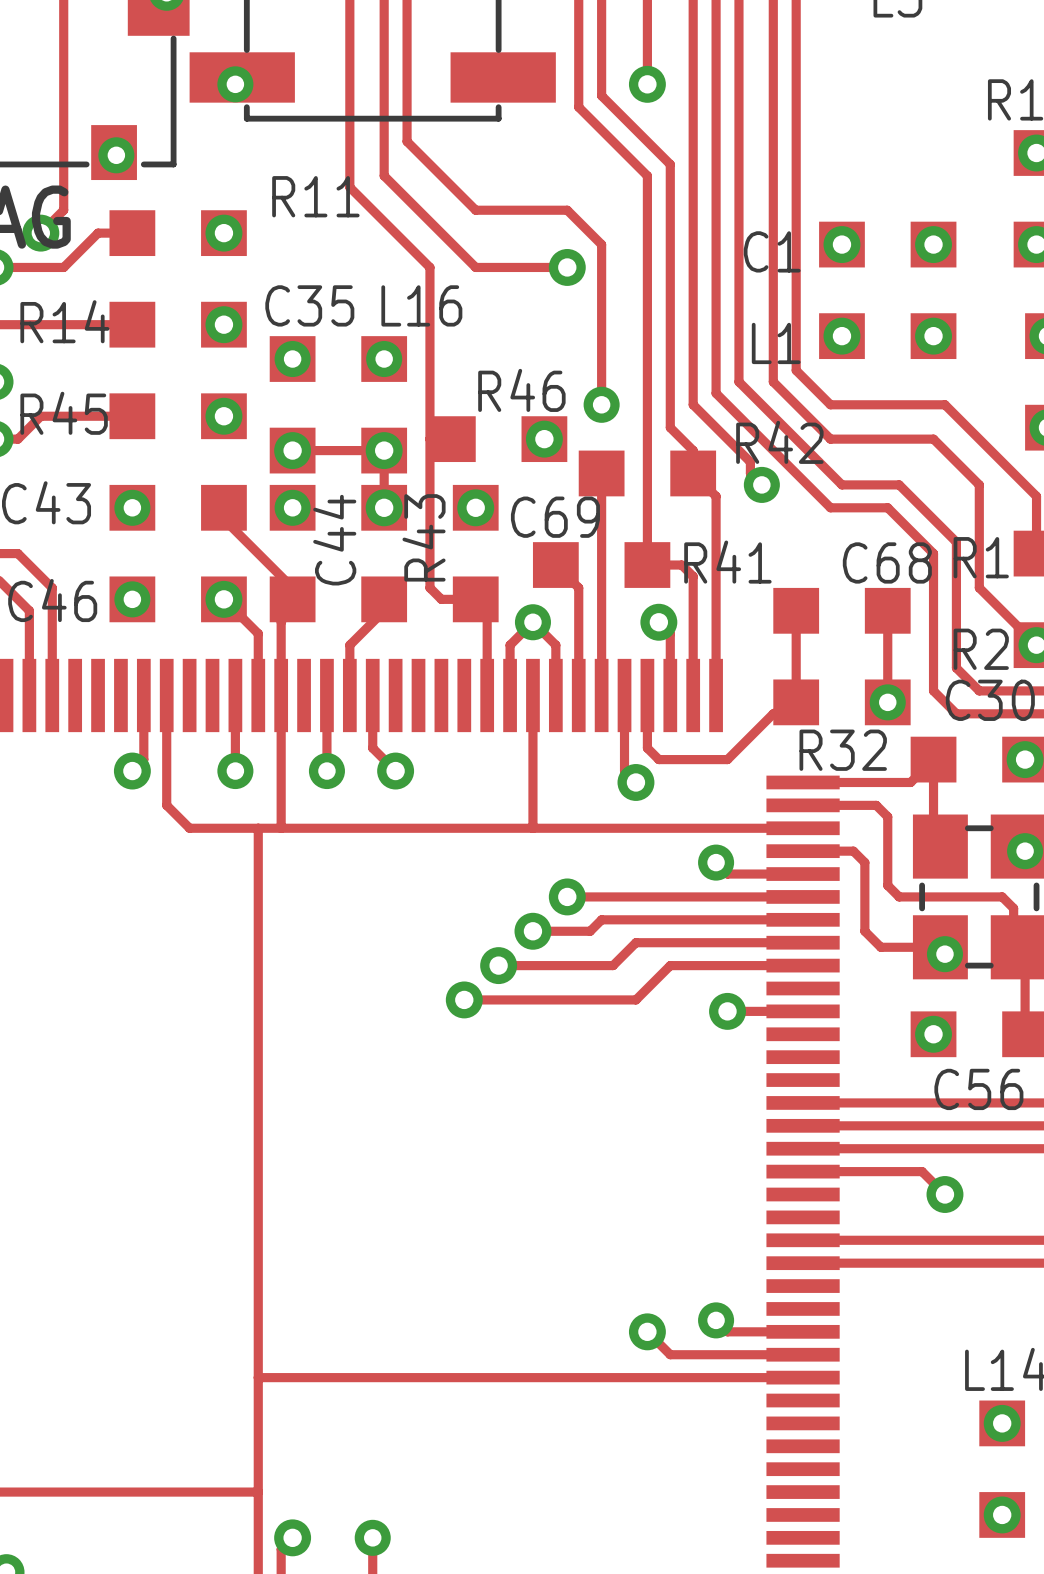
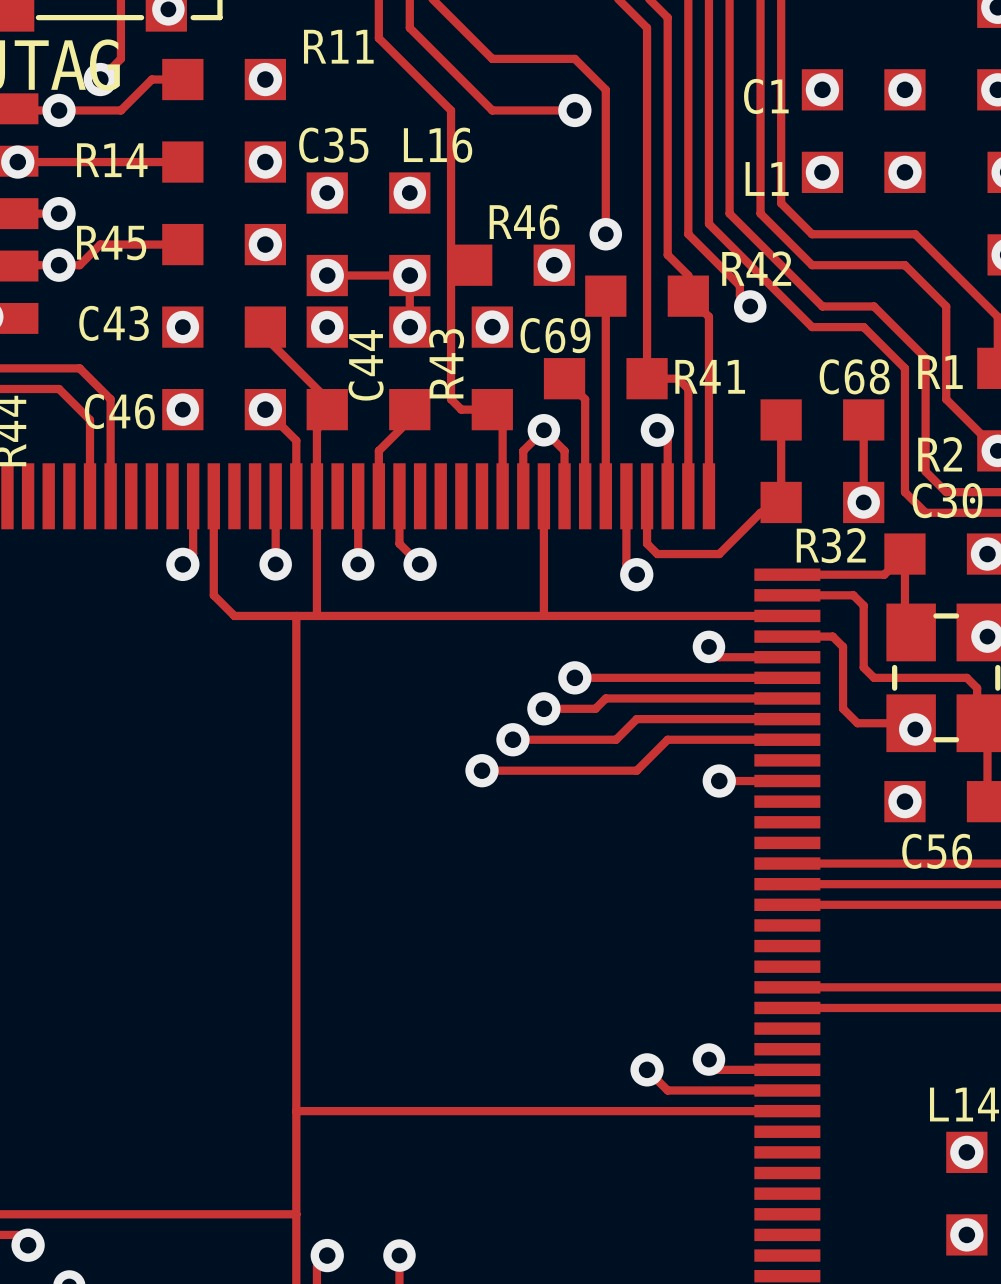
track: (803, 1171) (922, 1171) (944, 1194) -> none
via: (944, 1194) -> none

